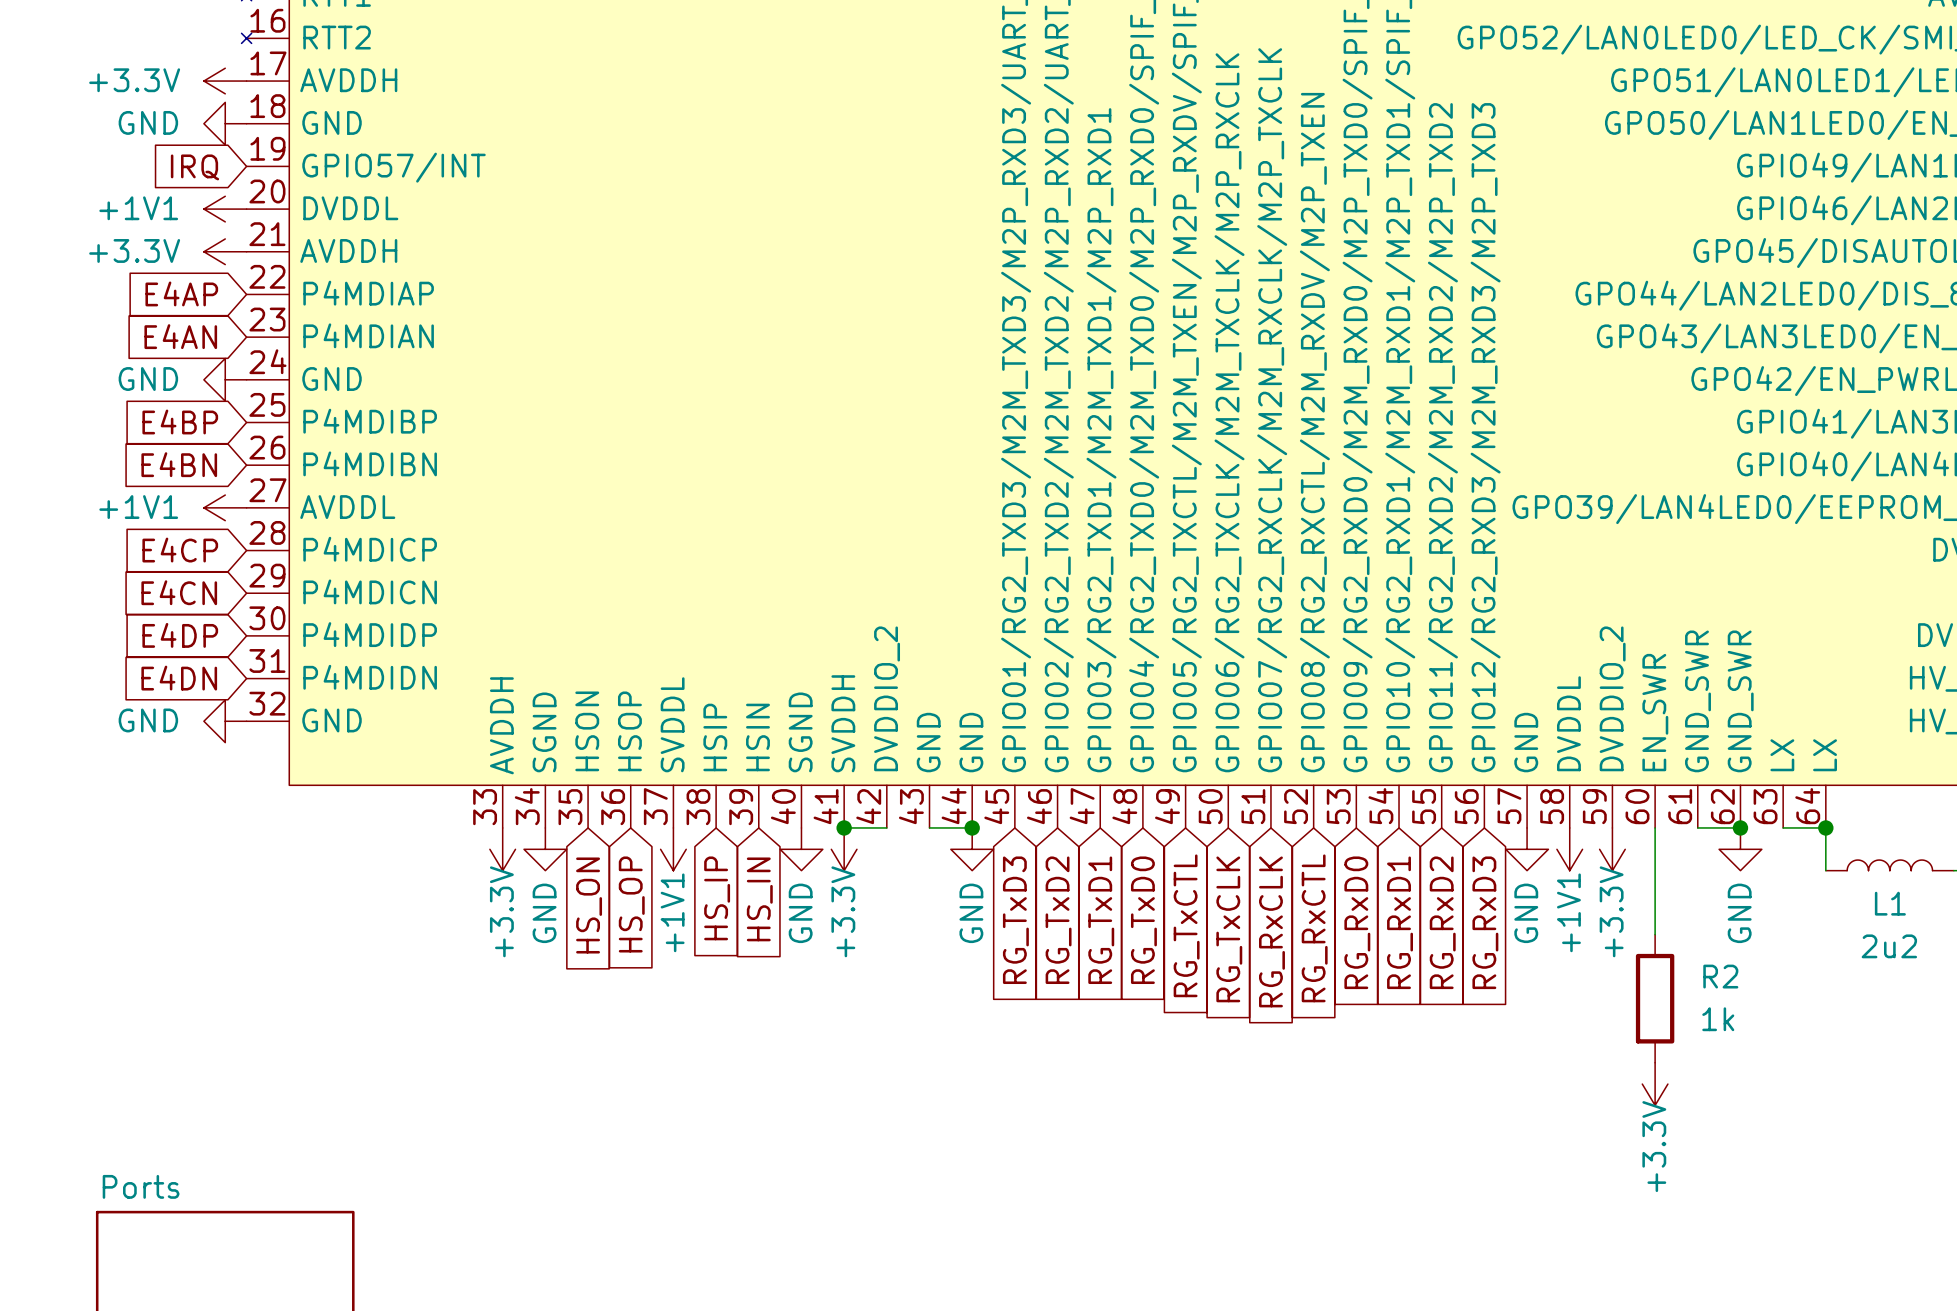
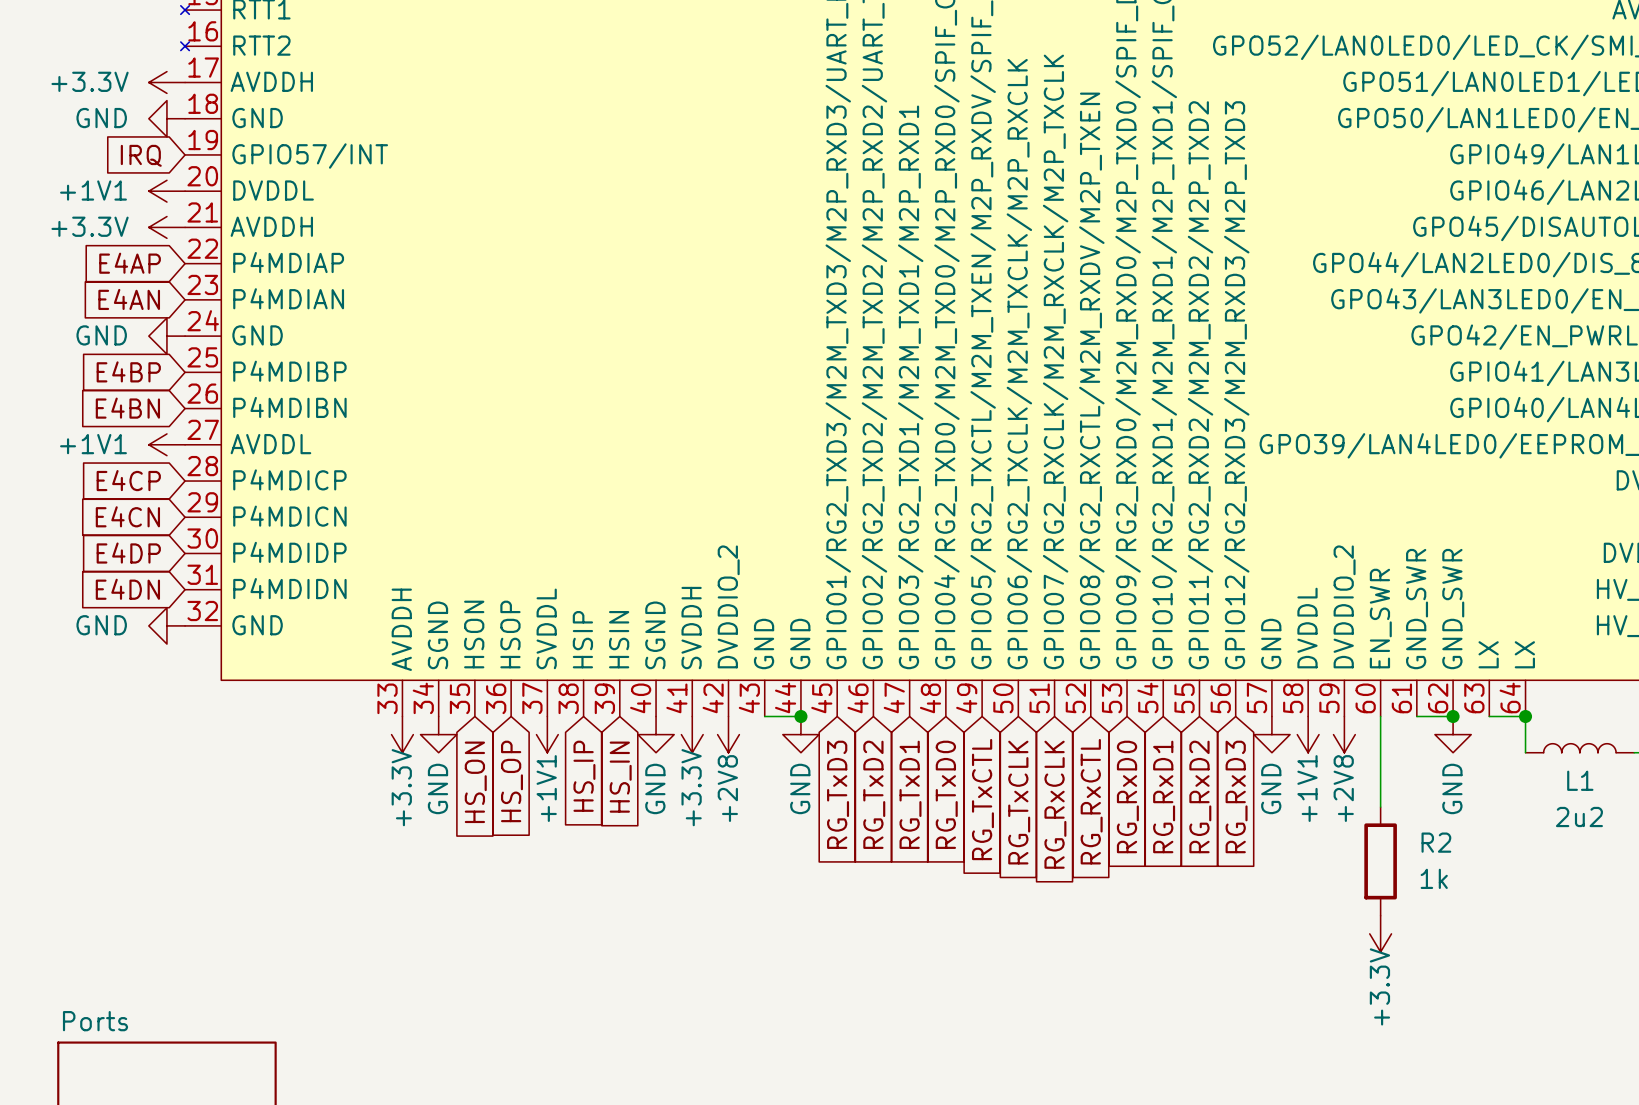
wire: (844, 827) (886, 827) -> none
junction: (844, 827) -> none
power symbol: none -> +2V8 (728, 734)
power symbol: +3.3V (1612, 849) -> +2V8 (1344, 734)

